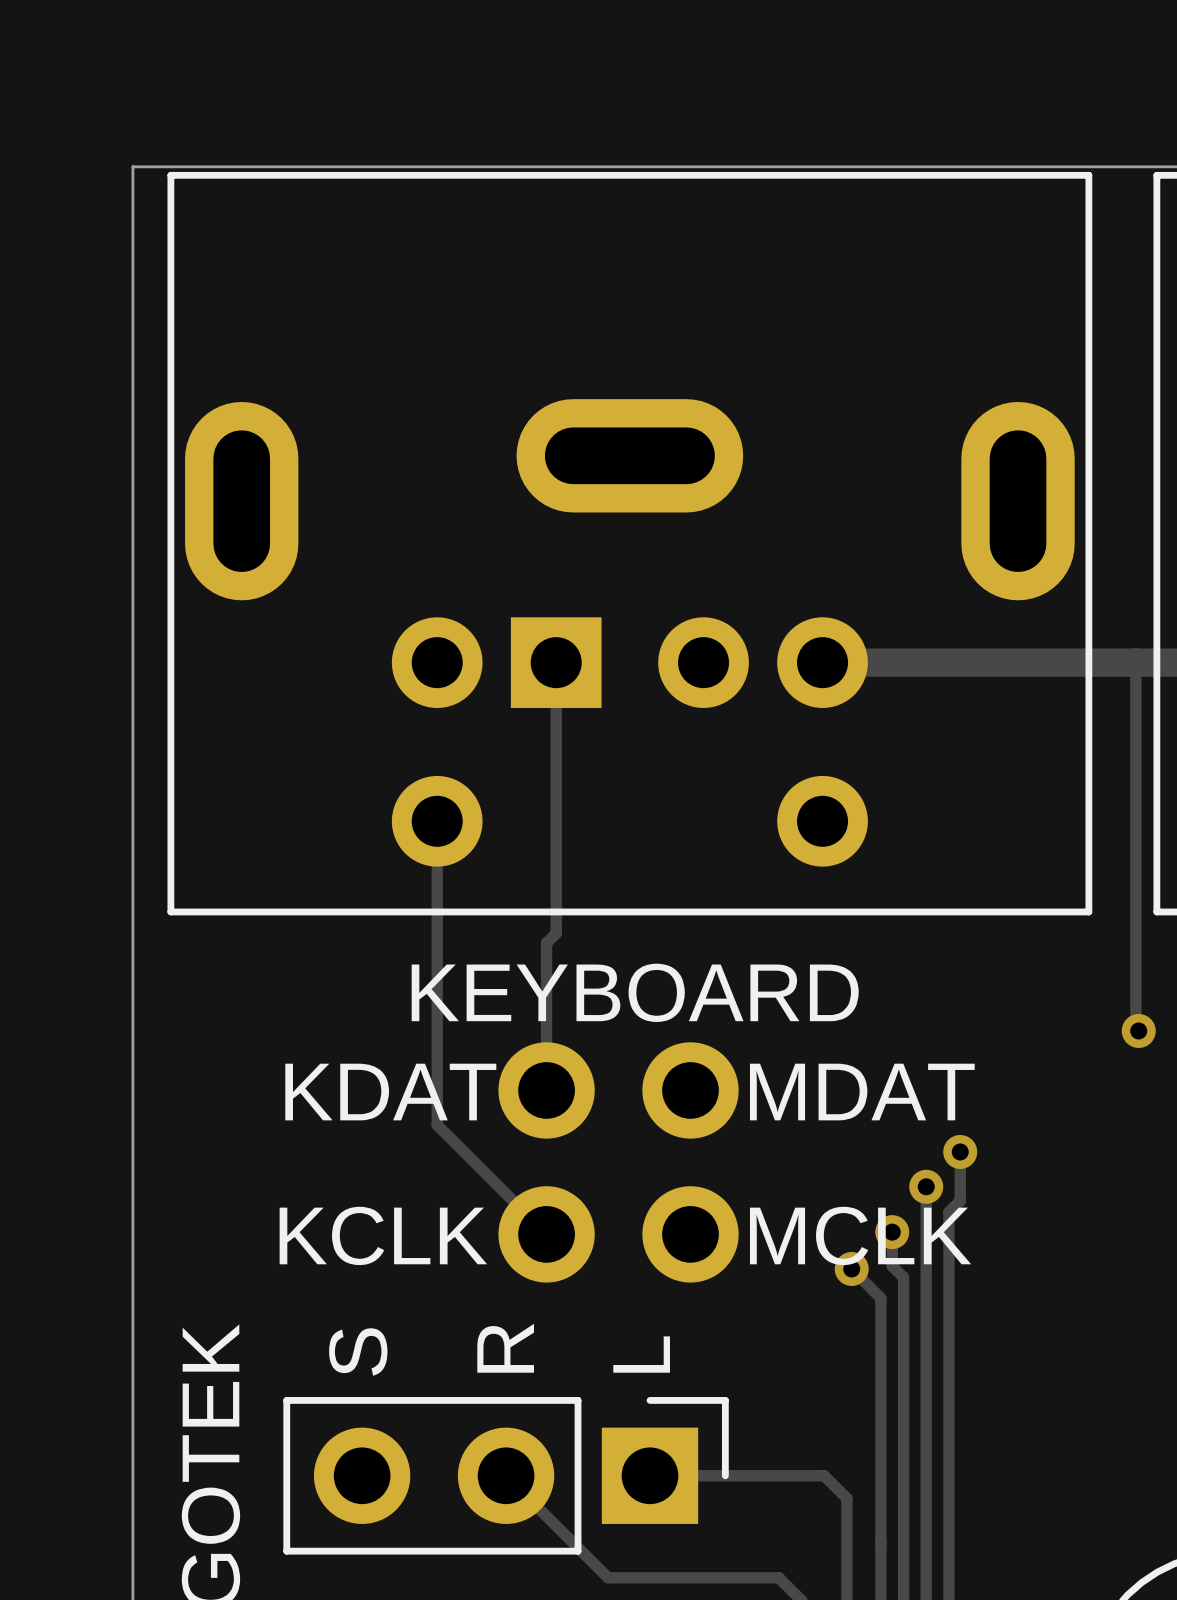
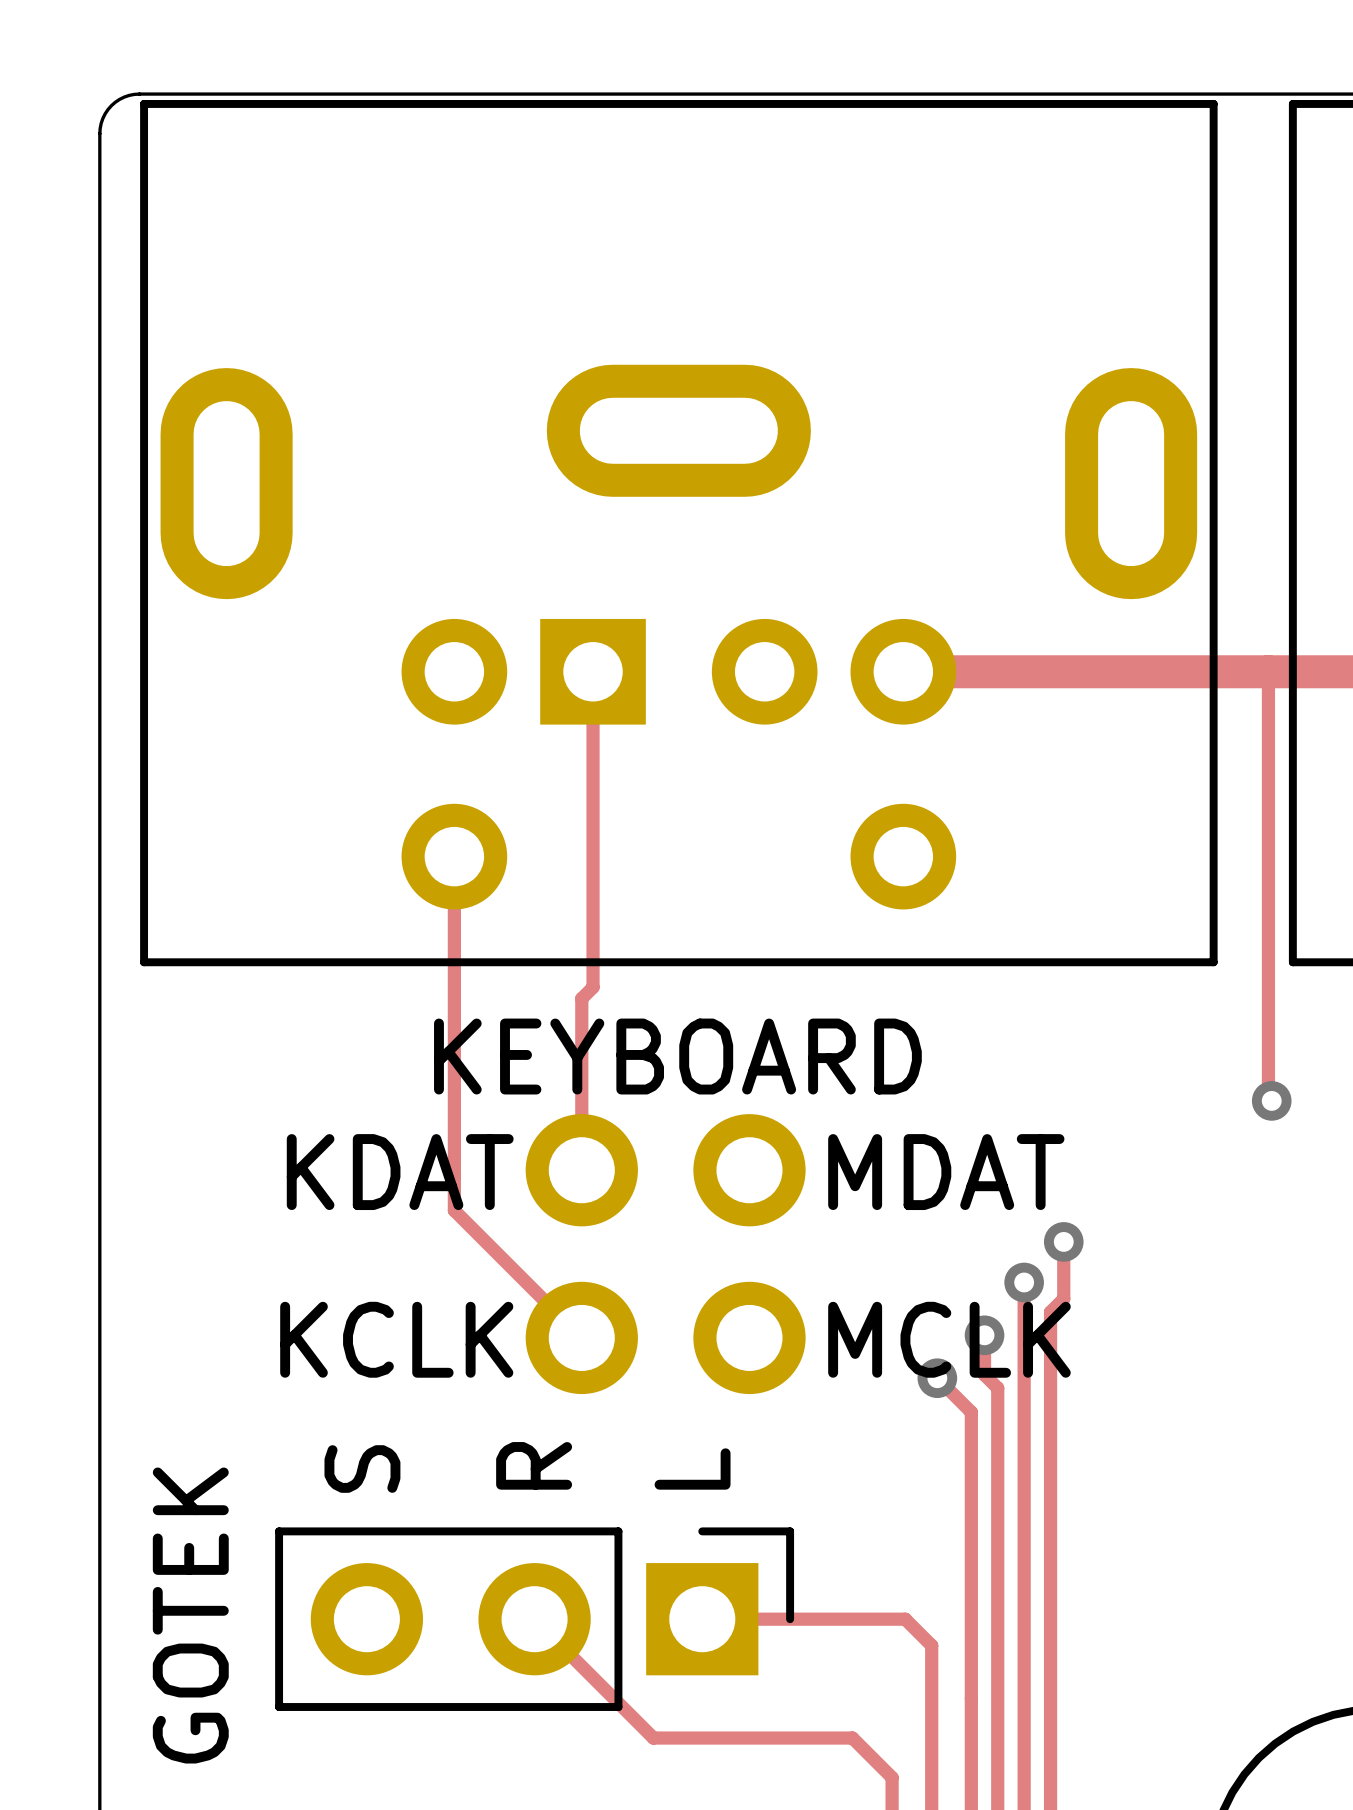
board edge: (166, 166) (132, 166) (132, 200) -> (139, 94) (124, 97) (111, 105) (102, 118) (99, 133)

